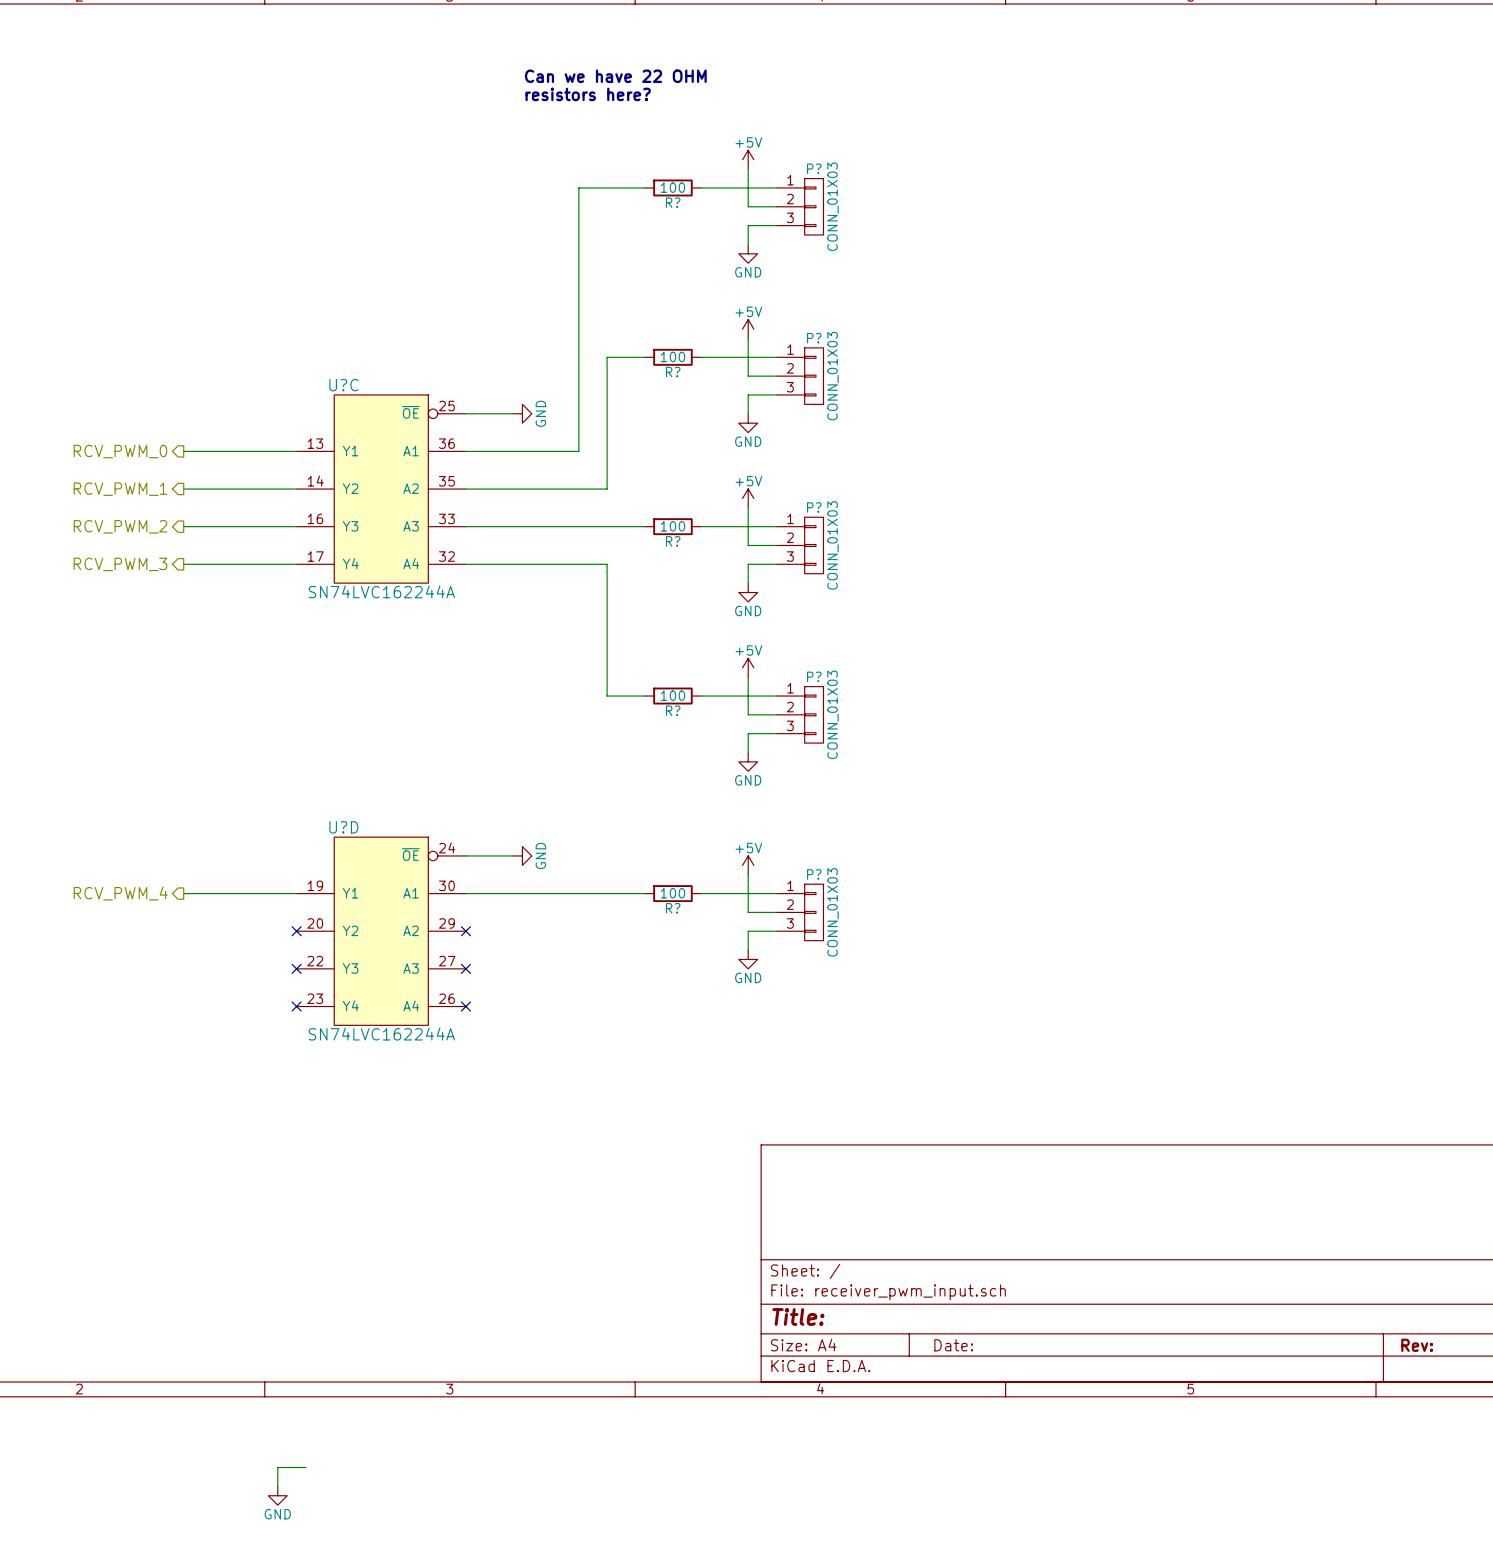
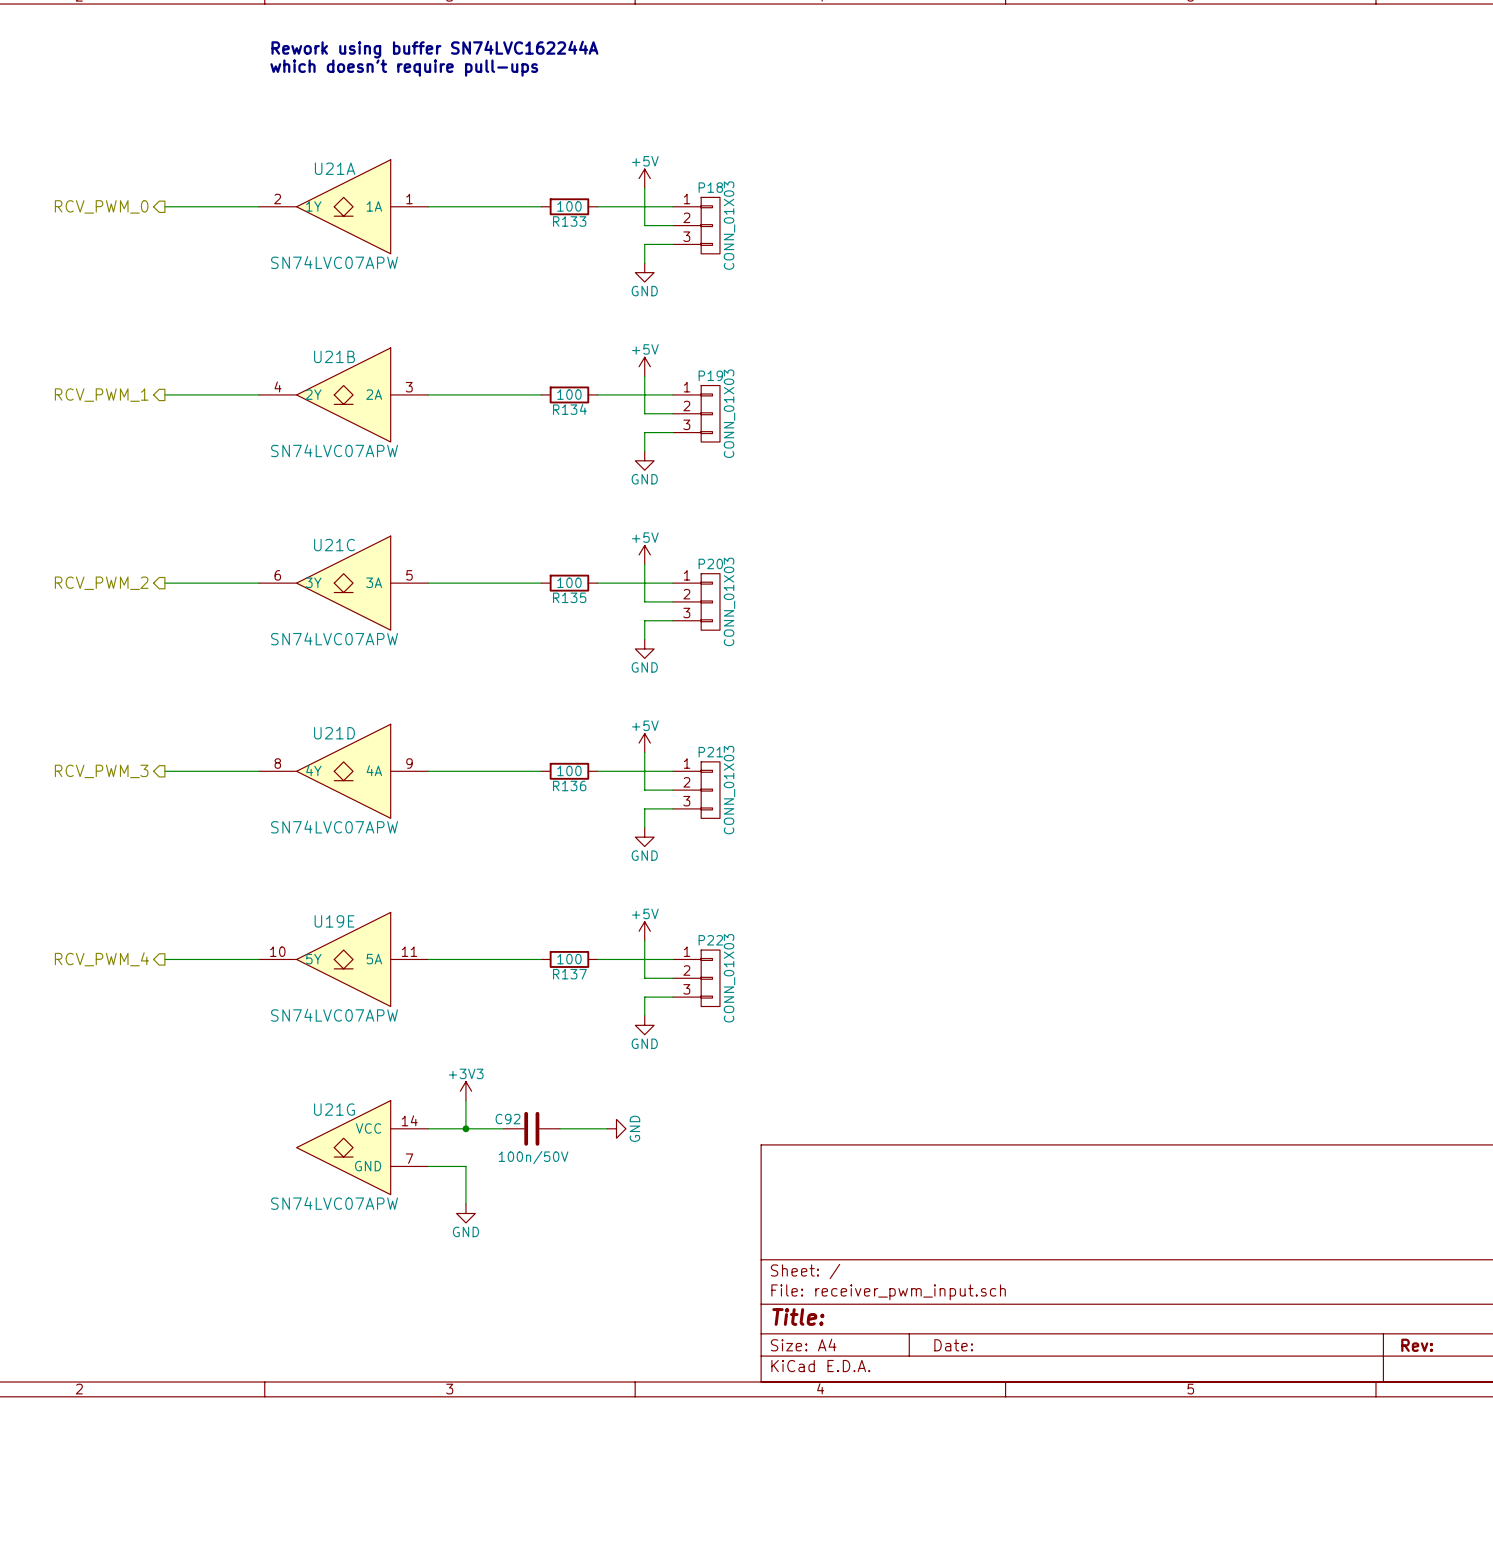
text: none -> Rework using buffer SN74LVC162244A (434, 49)
text: none -> which doesn't require pull-ups (404, 68)
text: Can we have 22 OHM (615, 76) -> none
text: resistors here? (588, 94) -> none
power symbol: +5V (748, 159) -> none
wire: (748, 169) (748, 206) (776, 206) -> none
power symbol: none -> +5V (644, 178)
wire: (644, 187) (578, 187) (578, 451) (465, 451) -> (644, 187) (644, 225) (672, 225)
R?: 100 (672, 187) -> none
wire: (701, 187) (776, 187) -> (597, 206) (672, 206)
hierarchical label: none -> RCV_PWM_0 (101, 206)
wire: none -> (164, 206) (258, 206)
U21A: none -> SN74LVC07APW (343, 206)
wire: none -> (428, 206) (541, 206)
R133: none -> 100 (569, 206)
P?: CONN_01X03 (799, 206) -> none
P18: none -> CONN_01X03 (696, 225)
wire: (776, 225) (748, 225) (748, 244) -> (672, 244) (644, 244) (644, 263)
power symbol: GND (748, 253) -> none
power symbol: none -> GND (644, 272)
power symbol: +5V (748, 329) -> none
wire: (748, 338) (748, 376) (776, 376) -> (644, 376) (644, 413) (672, 413)
wire: (644, 357) (607, 357) (607, 489) (465, 489) -> none
R?: 100 (672, 357) -> none
wire: (701, 357) (776, 357) -> (597, 394) (672, 394)
power symbol: none -> +5V (644, 366)
P?: CONN_01X03 (799, 376) -> none
wire: none -> (164, 394) (258, 394)
U21B: none -> SN74LVC07APW (343, 394)
wire: none -> (428, 394) (541, 394)
R134: none -> 100 (569, 394)
wire: (776, 394) (748, 394) (748, 413) -> (672, 432) (644, 432) (644, 451)
wire: (465, 413) (513, 413) -> none
power symbol: GND (522, 413) -> none
P19: none -> CONN_01X03 (696, 413)
power symbol: GND (748, 423) -> none
hierarchical label: RCV_PWM_0 (120, 451) -> none
wire: (183, 451) (296, 451) -> none
power symbol: none -> GND (644, 460)
hierarchical label position: RCV_PWM_1 (120, 489) -> RCV_PWM_1 (101, 395)
wire: (183, 489) (296, 489) -> none
U?C: SN74LVC162244A (381, 489) -> none
power symbol: +5V (748, 498) -> none
wire: (748, 507) (748, 545) (776, 545) -> (644, 564) (644, 601) (672, 601)
hierarchical label position: RCV_PWM_2 (120, 526) -> RCV_PWM_2 (101, 583)
wire: (183, 526) (296, 526) -> none
wire: (465, 526) (644, 526) -> none
R?: 100 (672, 526) -> none
wire: (701, 526) (776, 526) -> (597, 583) (672, 583)
P?: CONN_01X03 (799, 545) -> none
power symbol: none -> +5V (644, 554)
hierarchical label: RCV_PWM_3 (120, 564) -> none
wire: (183, 564) (296, 564) -> none
wire: (465, 564) (607, 564) (607, 696) (644, 696) -> none
wire: (776, 564) (748, 564) (748, 583) -> (672, 620) (644, 620) (644, 639)
wire: none -> (164, 583) (258, 583)
U21C: none -> SN74LVC07APW (343, 583)
wire: none -> (428, 583) (541, 583)
R135: none -> 100 (569, 583)
power symbol: GND (748, 592) -> none
P20: none -> CONN_01X03 (696, 601)
power symbol: none -> GND (644, 648)
power symbol: +5V (748, 667) -> none
wire: (748, 677) (748, 714) (776, 714) -> (644, 752) (644, 790) (672, 790)
R?: 100 (672, 696) -> none
wire: (701, 696) (776, 696) -> (597, 771) (672, 771)
P?: CONN_01X03 (799, 714) -> none
wire: (776, 733) (748, 733) (748, 752) -> (672, 808) (644, 808) (644, 827)
power symbol: none -> +5V (644, 743)
power symbol: GND (748, 761) -> none
hierarchical label: none -> RCV_PWM_3 (101, 771)
wire: none -> (164, 771) (258, 771)
U21D: none -> SN74LVC07APW (343, 771)
wire: none -> (428, 771) (541, 771)
R136: none -> 100 (569, 771)
P21: none -> CONN_01X03 (696, 790)
power symbol: none -> GND (644, 837)
wire: (465, 855) (513, 855) -> none
power symbol: GND (522, 855) -> none
power symbol: +5V (748, 865) -> none
wire: (748, 874) (748, 912) (776, 912) -> (644, 940) (644, 978) (672, 978)
hierarchical label position: RCV_PWM_4 (120, 893) -> RCV_PWM_4 (101, 959)
wire: (183, 893) (296, 893) -> none
wire: (465, 893) (644, 893) -> none
R?: 100 (672, 893) -> none
wire: (701, 893) (776, 893) -> (597, 959) (672, 959)
P?: CONN_01X03 (799, 912) -> none
no-connect mark: (296, 931) -> none
U?D: SN74LVC162244A (381, 931) -> none
no-connect mark: (465, 931) -> none
power symbol: none -> +5V (644, 931)
wire: (776, 931) (748, 931) (748, 950) -> (672, 997) (644, 997) (644, 1015)
wire: none -> (164, 959) (258, 959)
U19E: none -> SN74LVC07APW (343, 959)
wire: none -> (428, 959) (541, 959)
R137: none -> 100 (569, 959)
power symbol: GND (748, 959) -> none
no-connect mark: (296, 968) -> none
no-connect mark: (465, 968) -> none
P22: none -> CONN_01X03 (696, 978)
no-connect mark: (296, 1006) -> none
no-connect mark: (465, 1006) -> none
power symbol: none -> GND (644, 1025)
power symbol: none -> +3V3 (465, 1091)
wire: none -> (465, 1100) (465, 1128)
wire: none -> (428, 1128) (503, 1128)
junction: none -> (465, 1128)
C92: none -> 100n/50V (531, 1128)
wire: none -> (560, 1128) (607, 1128)
power symbol: none -> GND (616, 1128)
U21G: none -> SN74LVC07APW (362, 1147)
wire: none -> (428, 1166) (465, 1166) (465, 1204)
power symbol: none -> GND (465, 1213)
wire: (306, 1467) (277, 1467) (277, 1486) -> none
power symbol: GND (277, 1495) -> none

